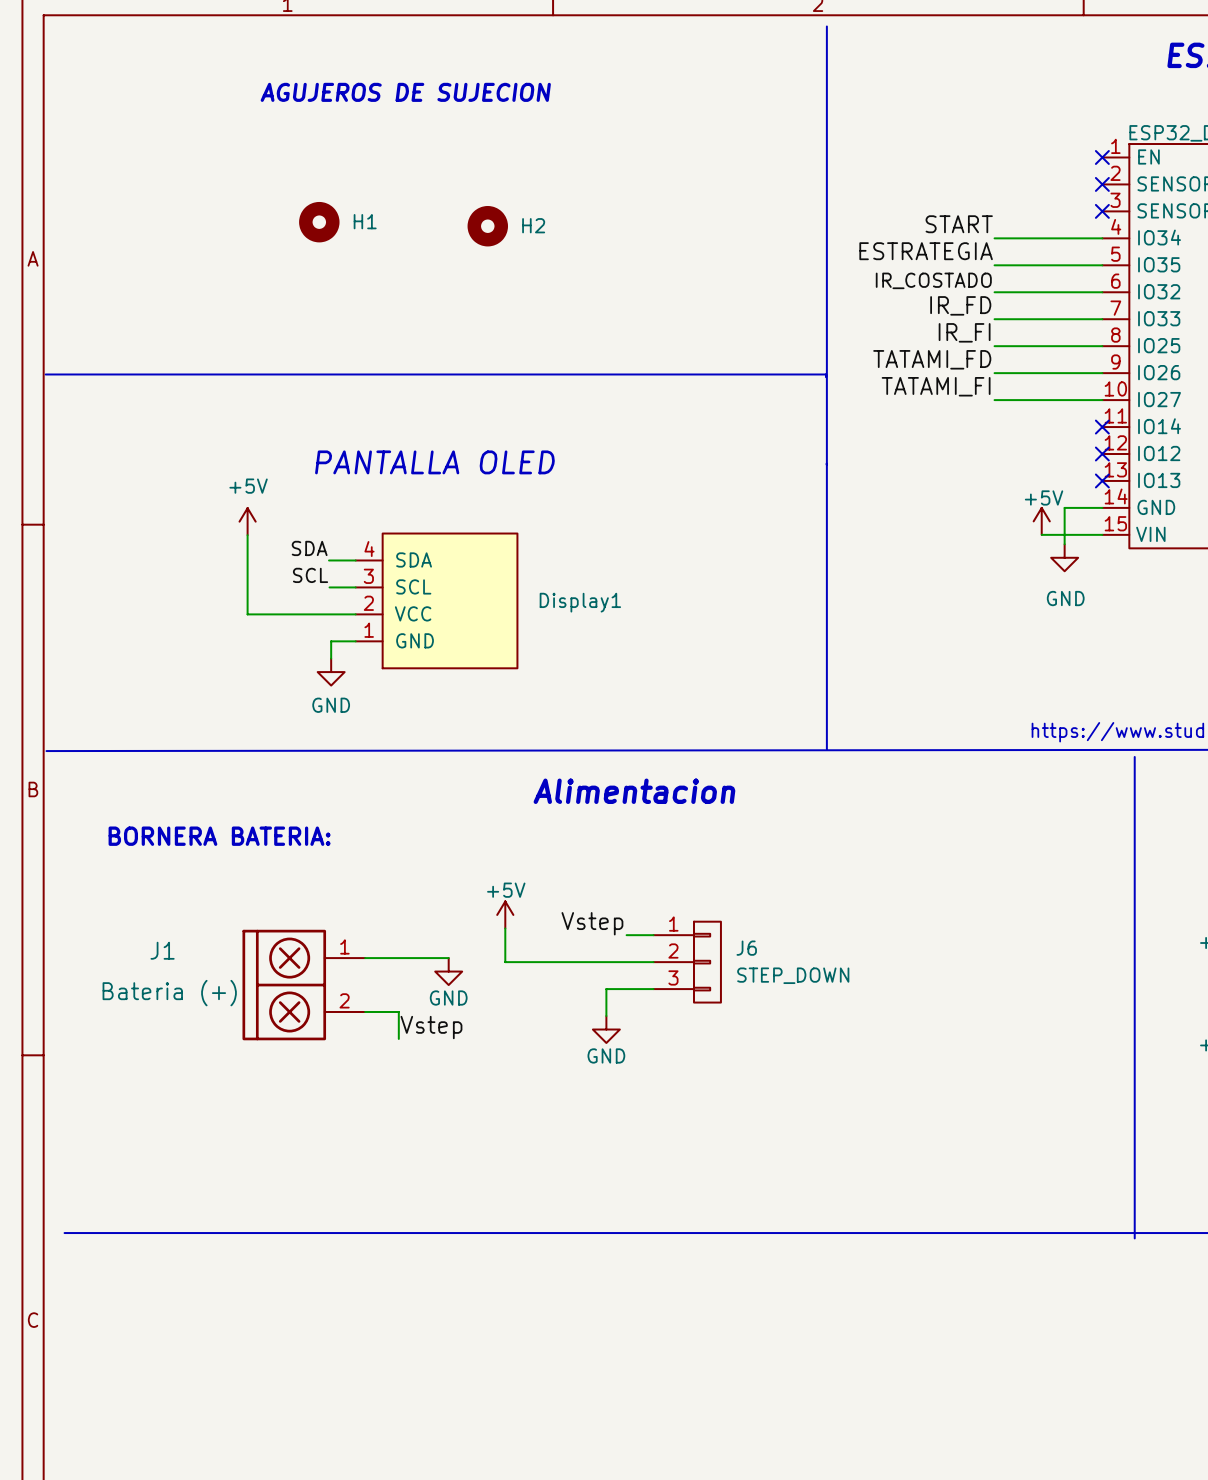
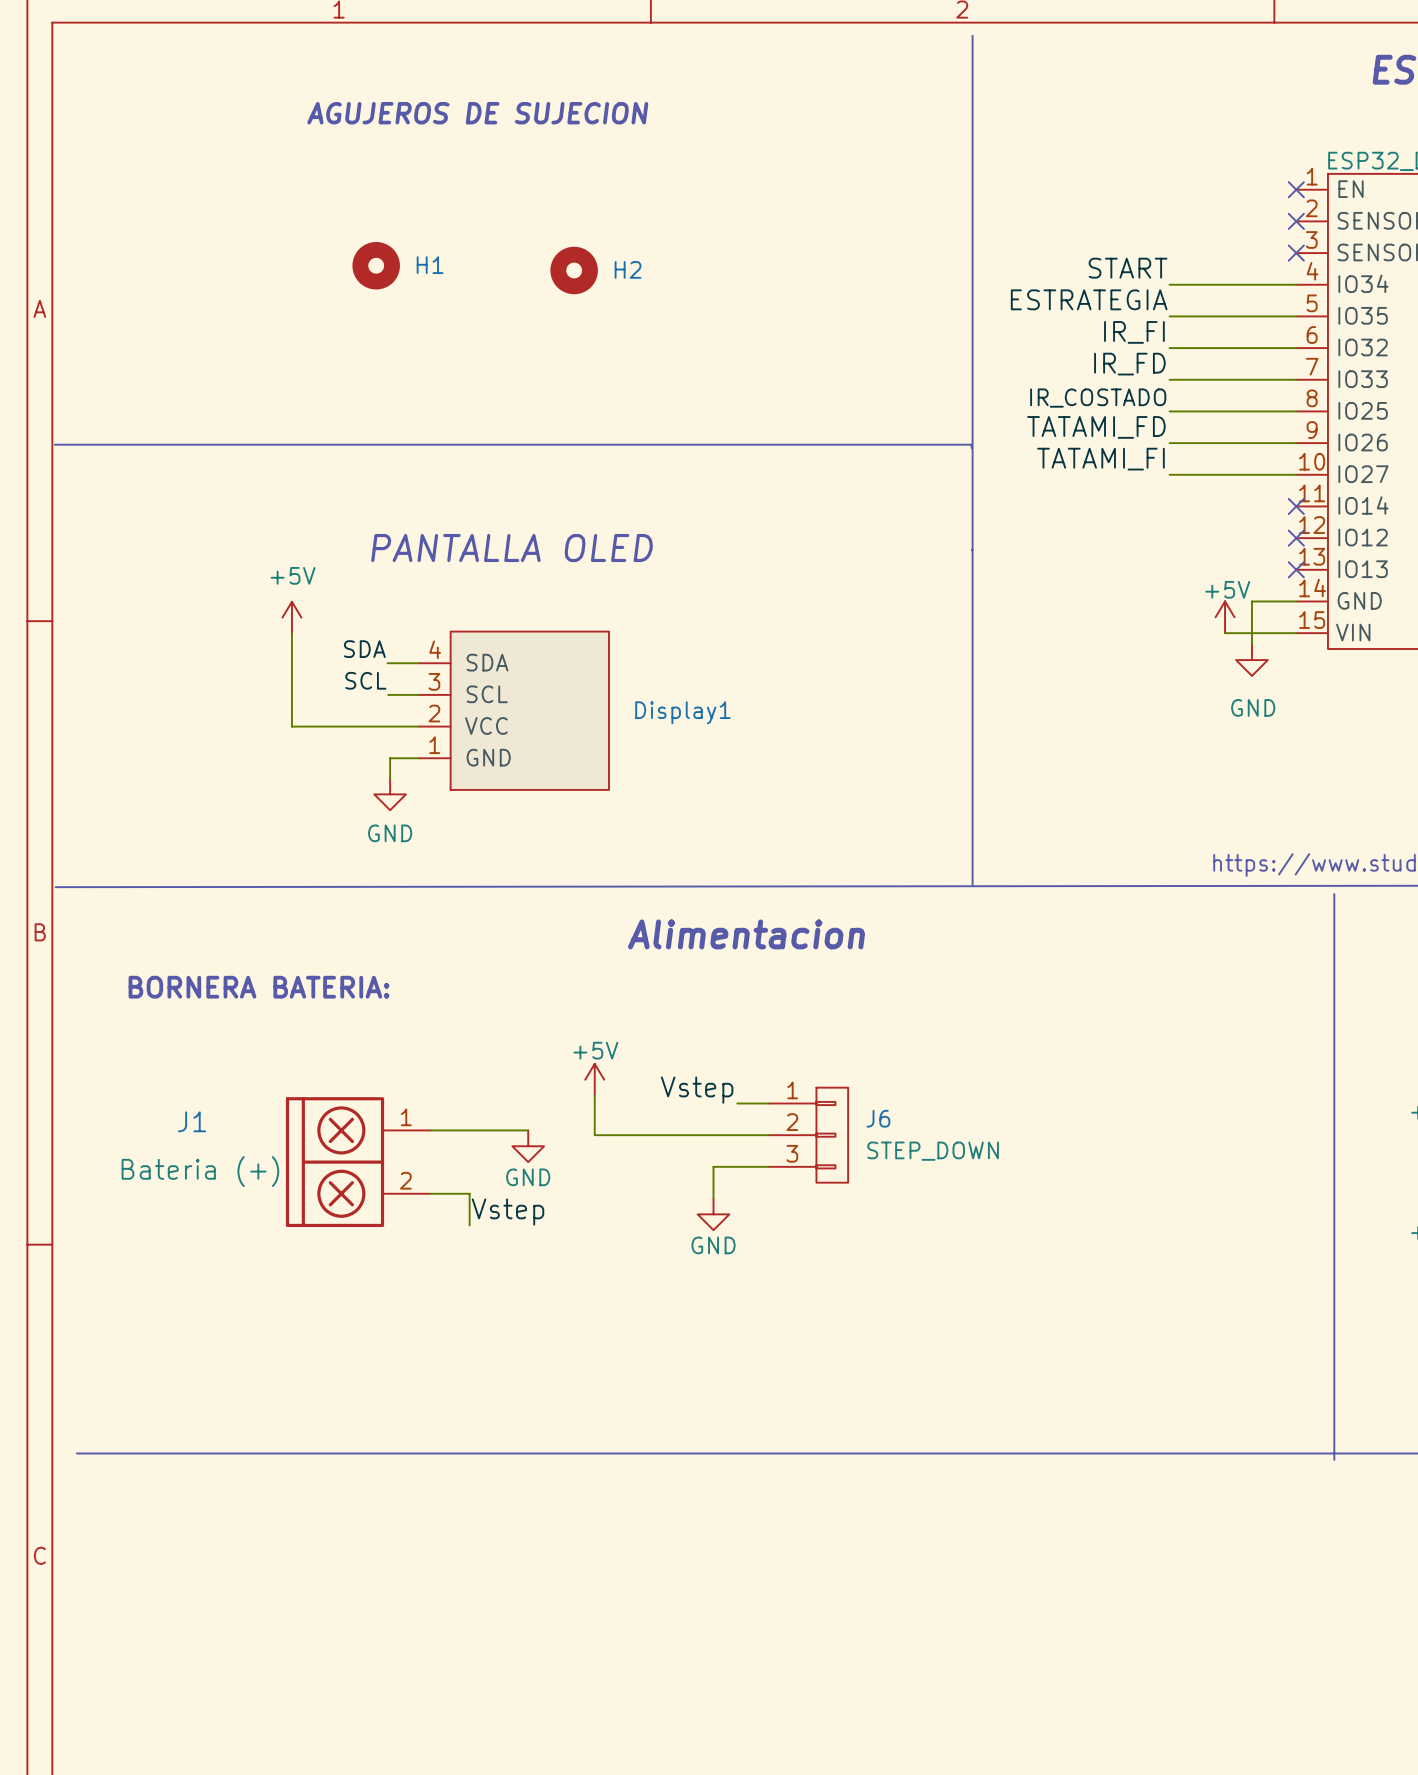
label: IR_COSTADO (933, 280) -> IR_FI (1134, 332)
label: IR_FI (964, 332) -> IR_COSTADO (1098, 398)

